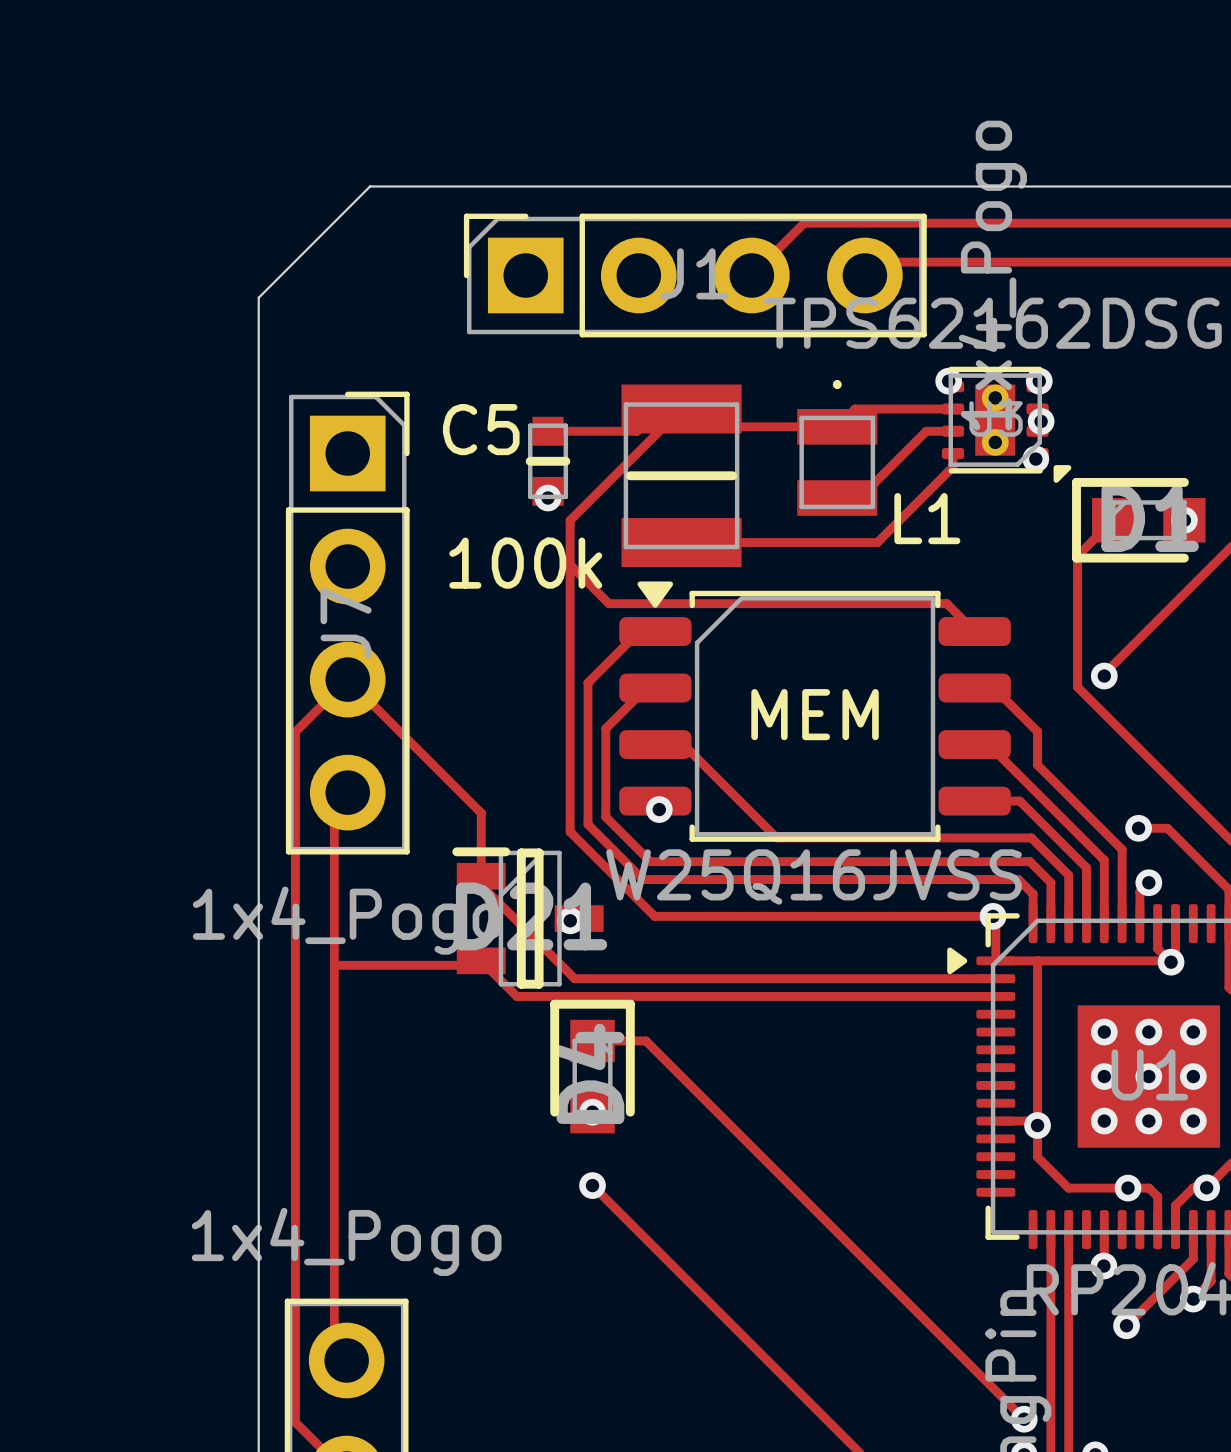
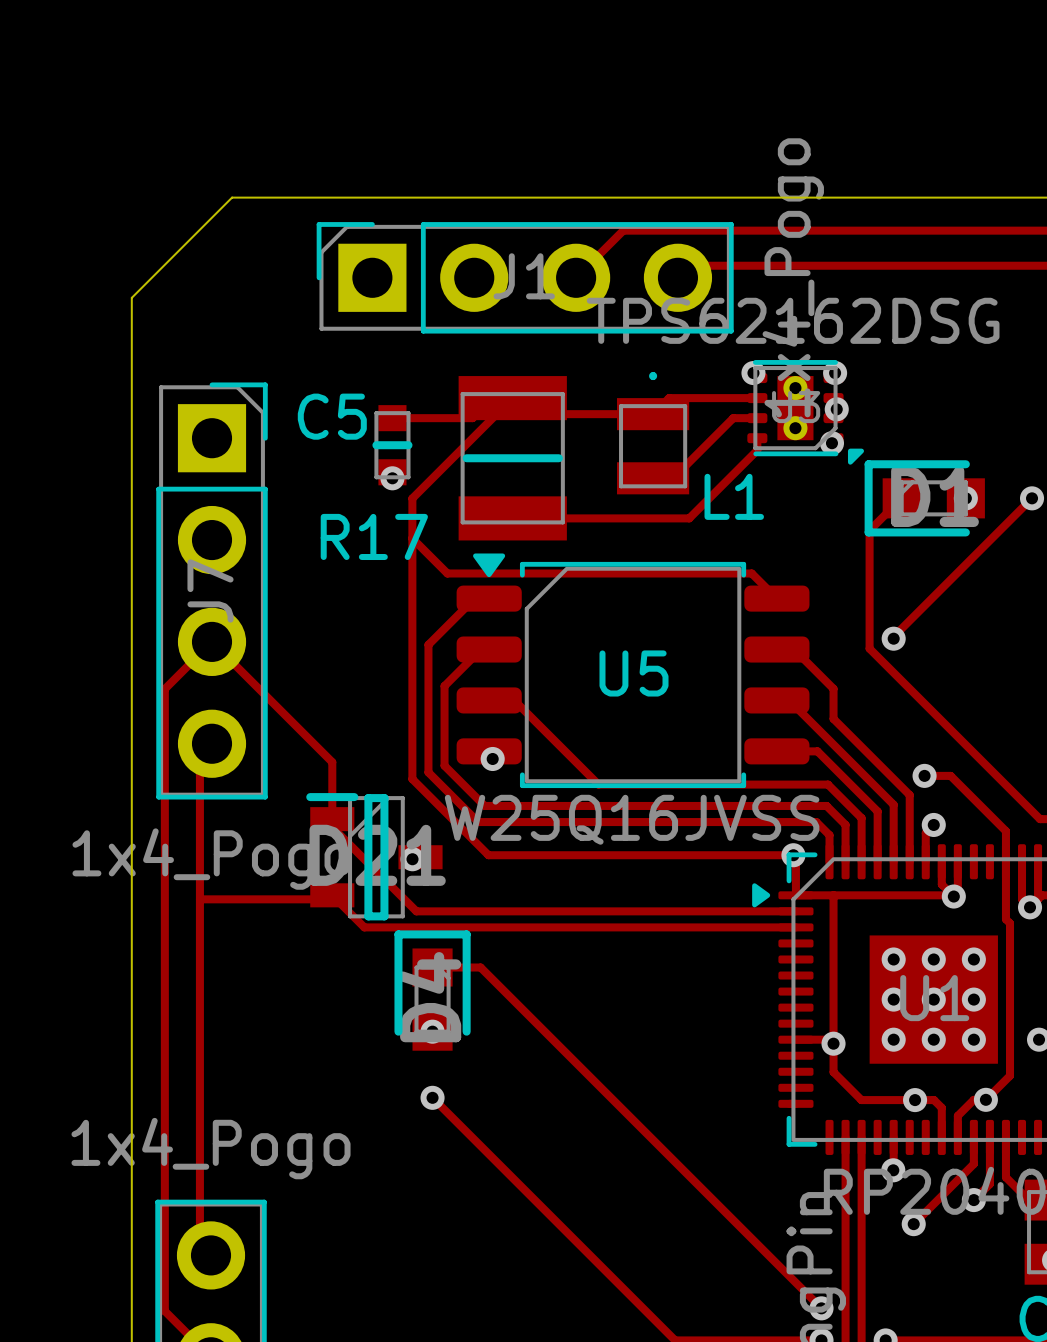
100k name: 100k (525, 563) -> R17 (374, 536)
MEM name: MEM (815, 714) -> U5 (634, 673)

